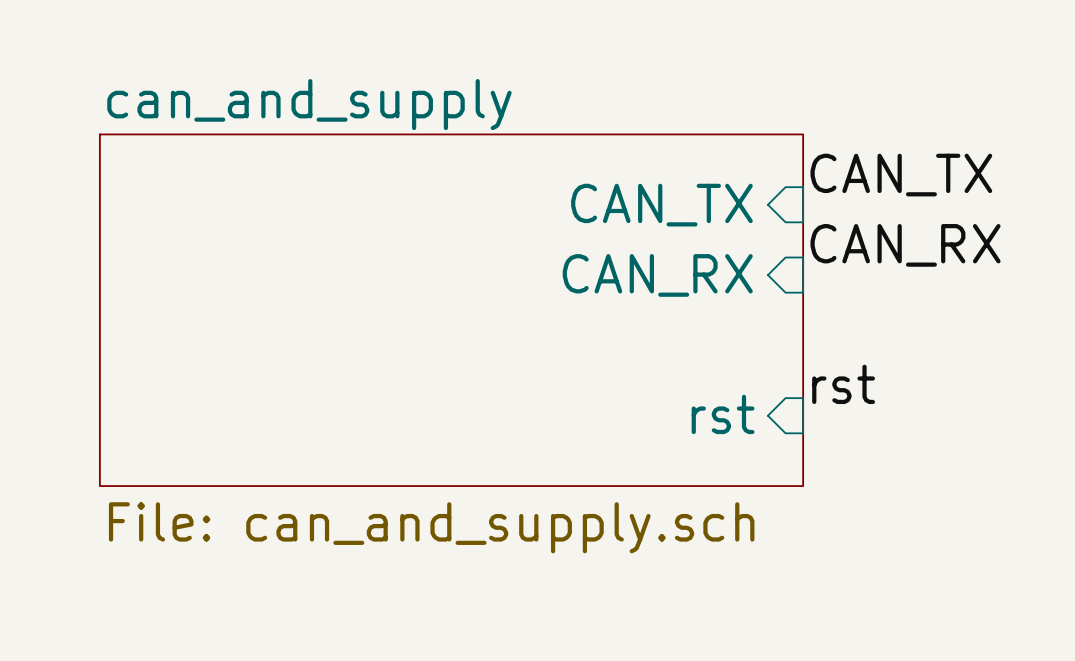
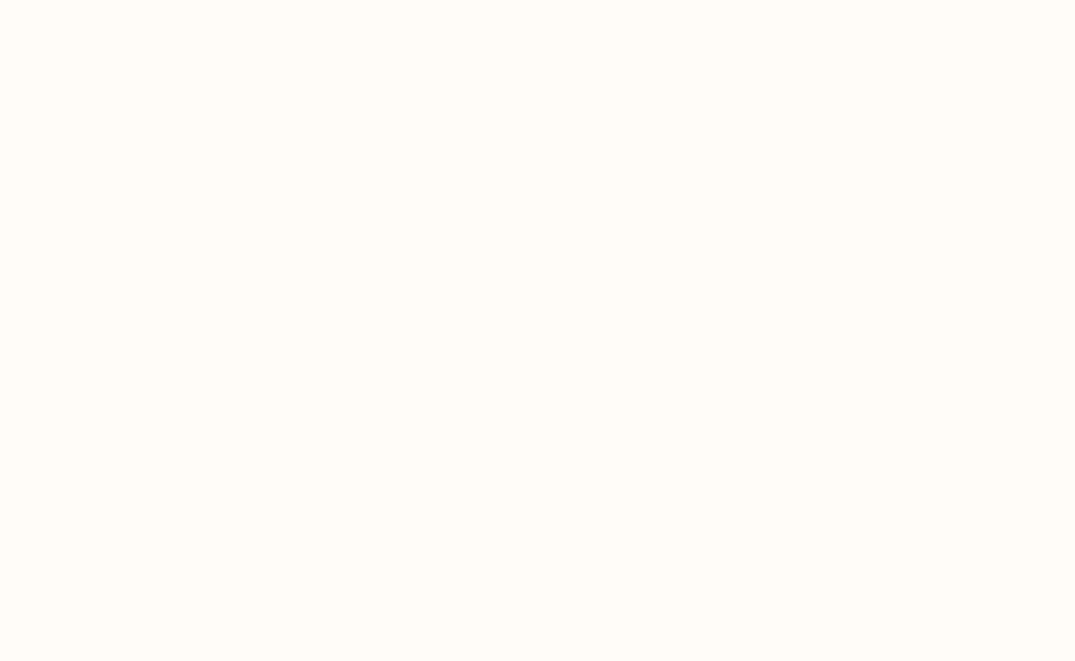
label: CAN_TX (901, 175) -> none
sheet pin: CAN_TX (661, 205) -> none
label: CAN_RX (905, 245) -> none
sheet pin: CAN_RX (657, 275) -> none
sheet can_and_supply: File: can_and_supply.sch (451, 310) -> none
label: rst (843, 384) -> none
sheet pin: rst (723, 414) -> none

